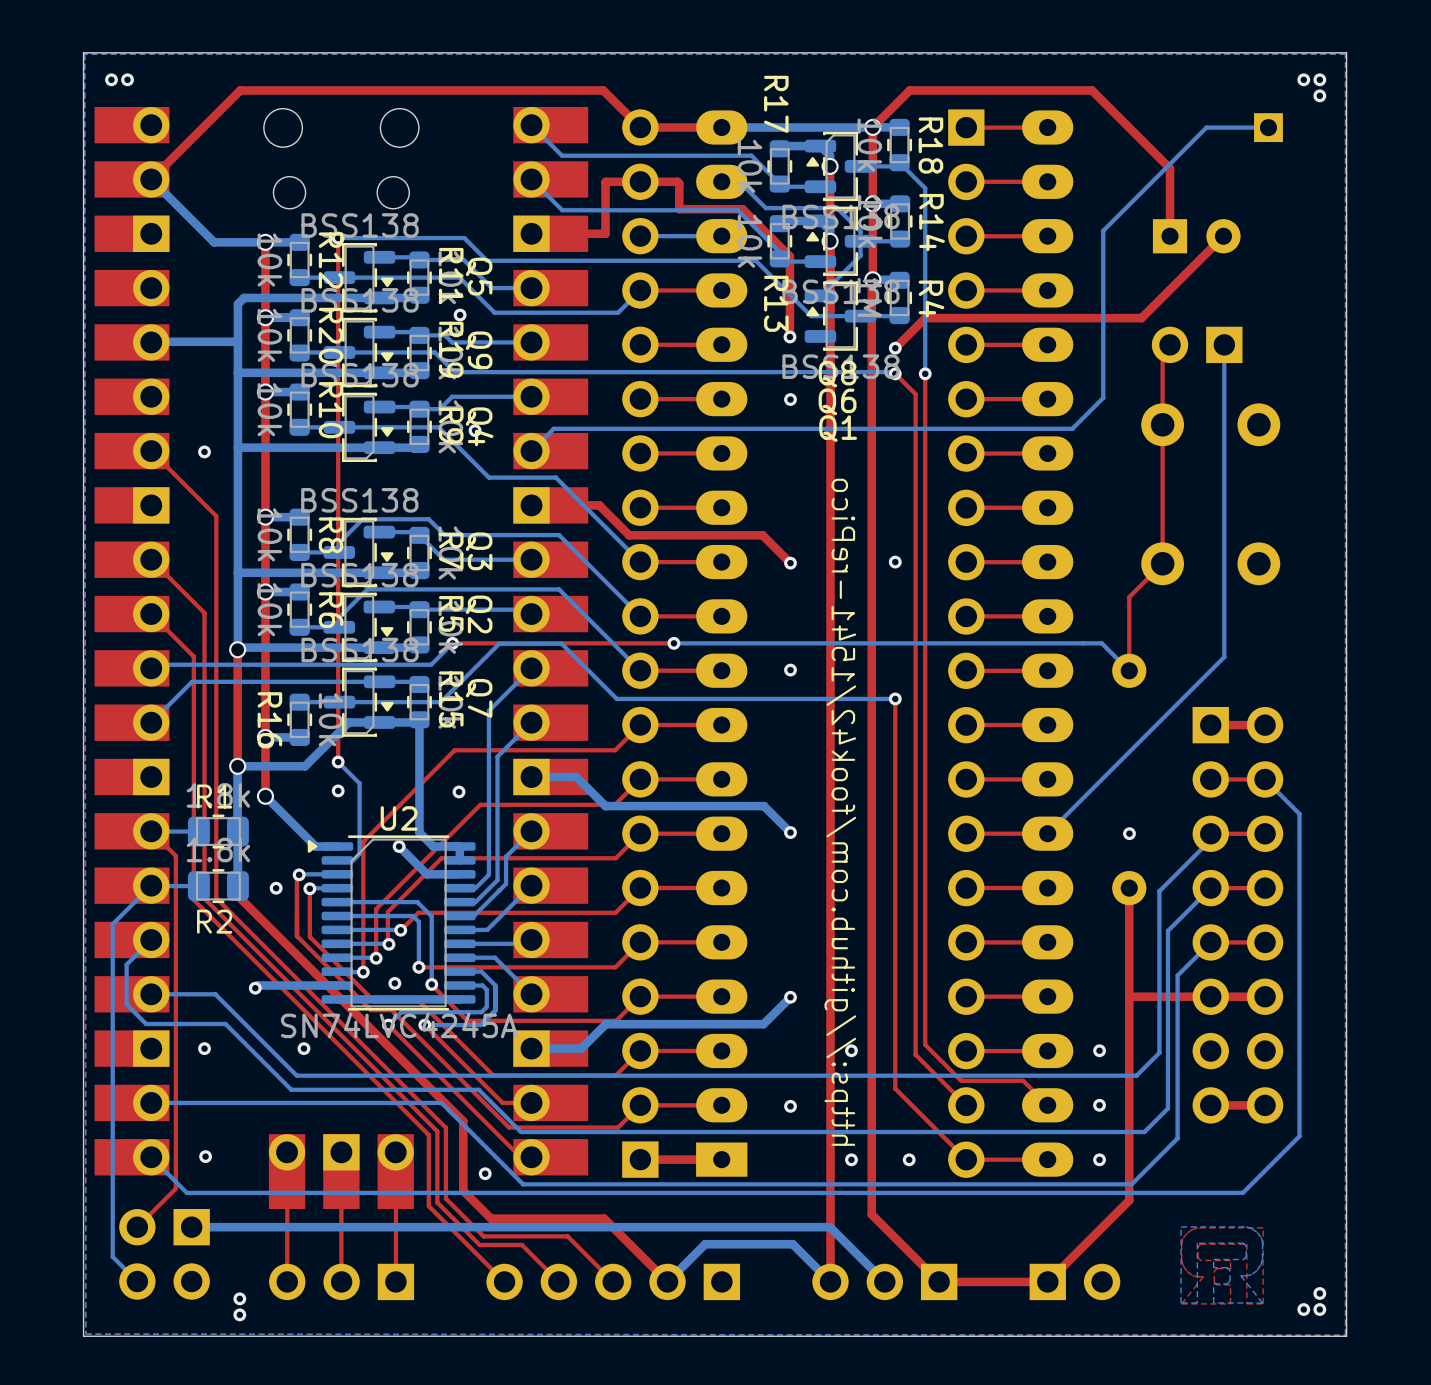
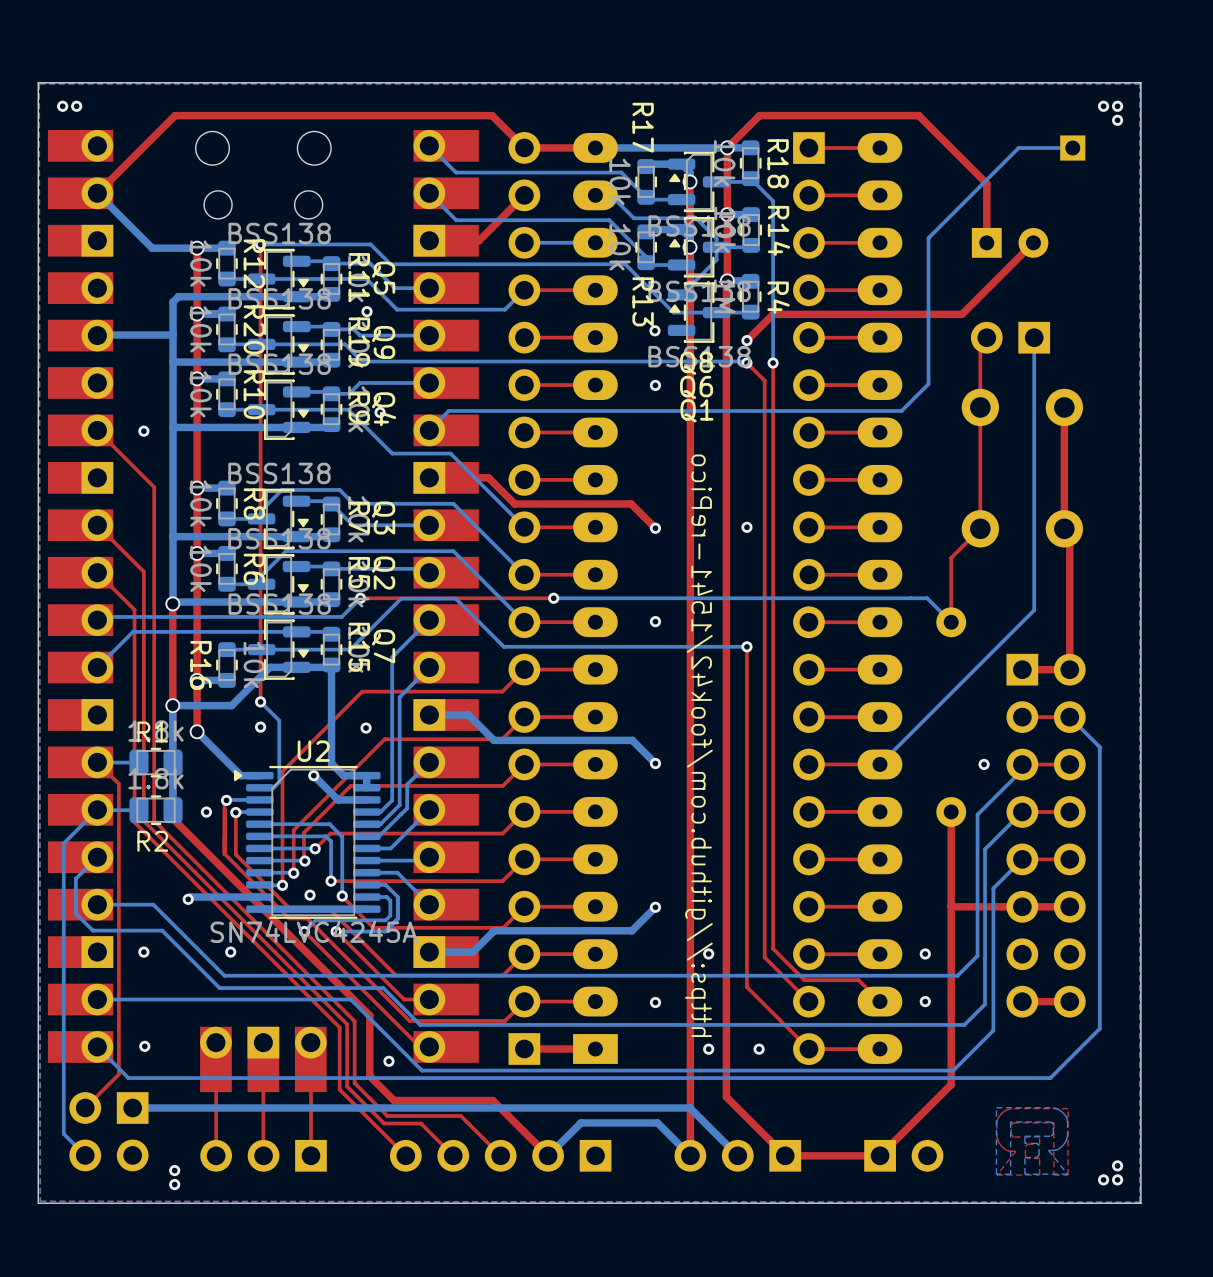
top track: (588, 233) (605, 233) (606, 181) (677, 181) (679, 183) (679, 209) (742, 209) (789, 256) (789, 336) -> (479, 240) (524, 195)
top track: none -> (1064, 407) (1064, 528)
top track: none -> (1069, 534) (1069, 669)
via position: (1129, 833) -> (984, 764)
via: (1099, 1159) -> none

